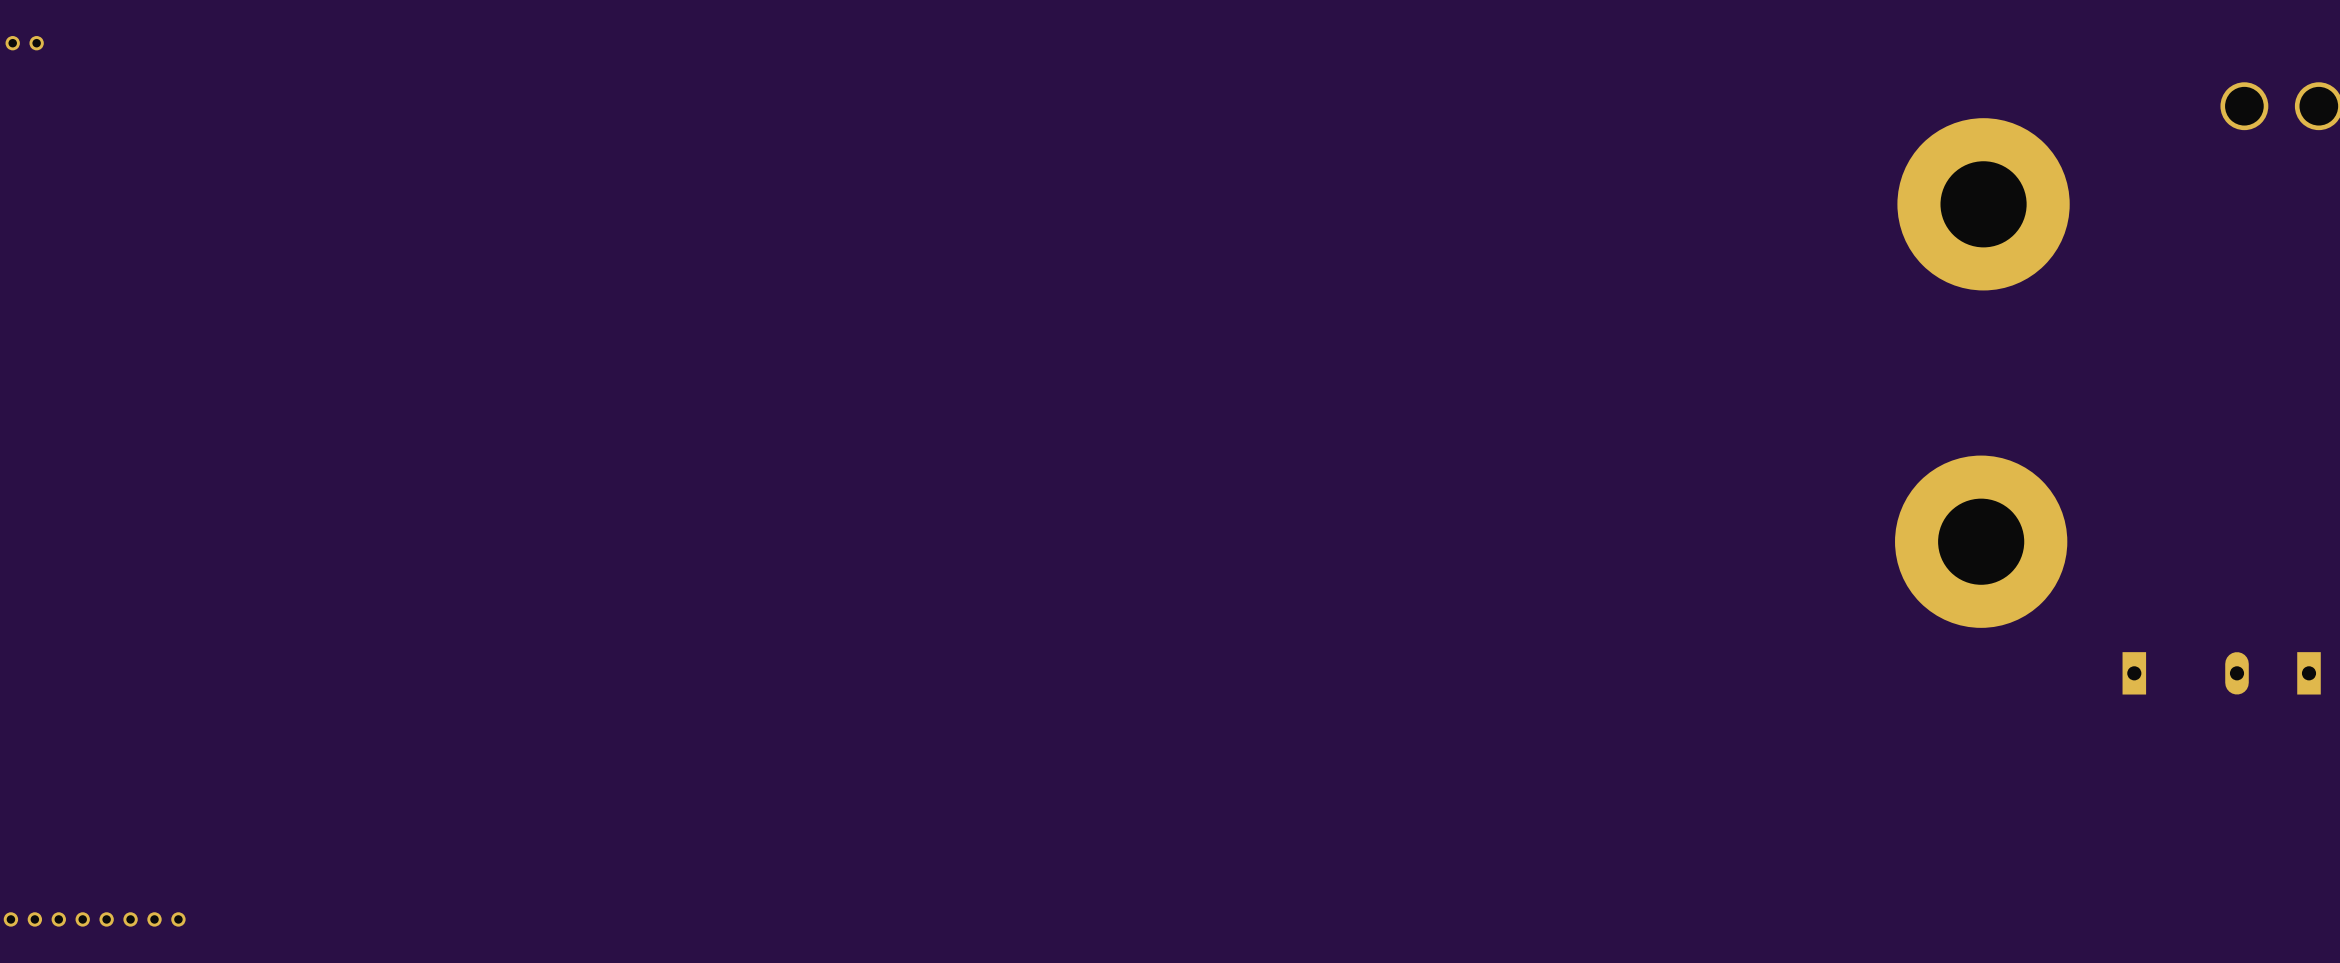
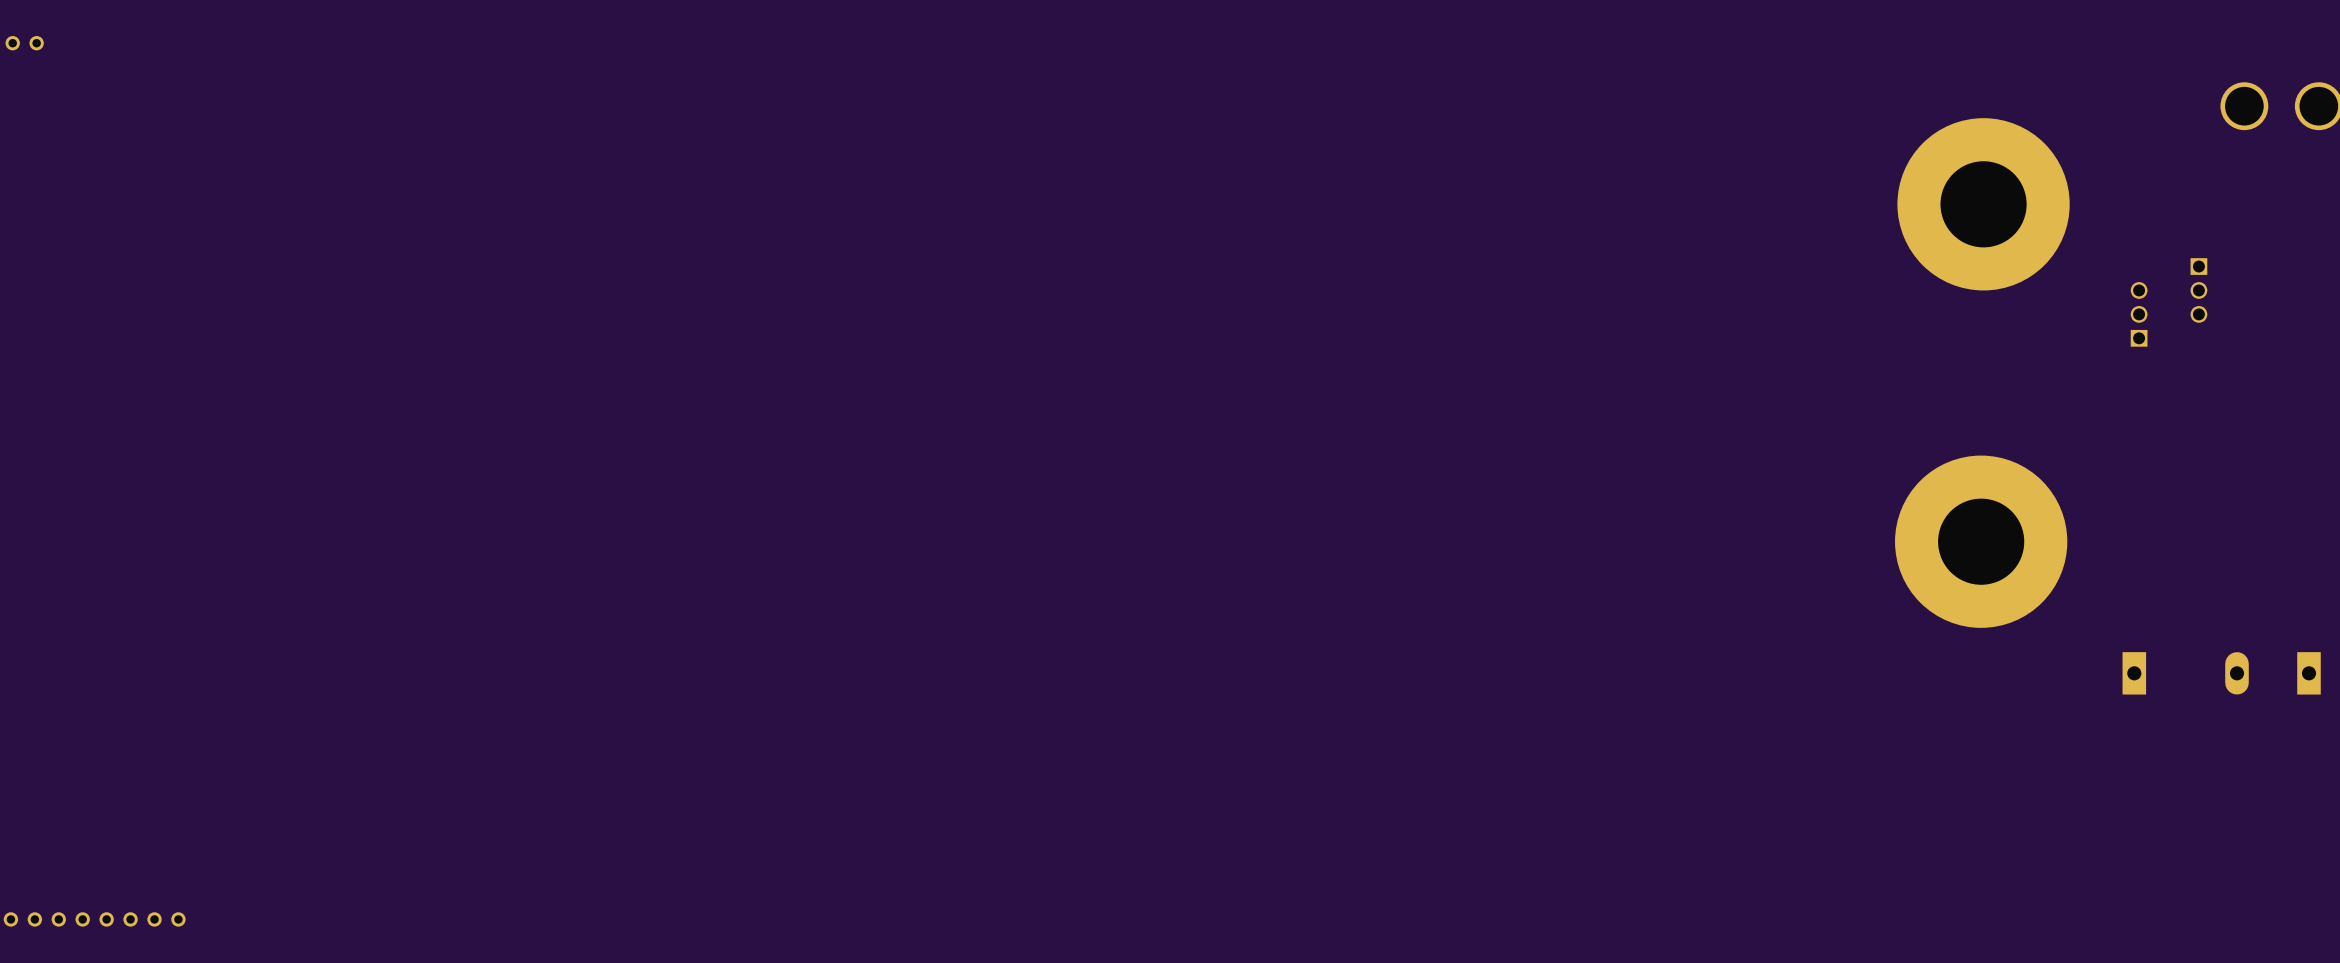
part: none -> (2198, 290)
part: none -> (2139, 314)

